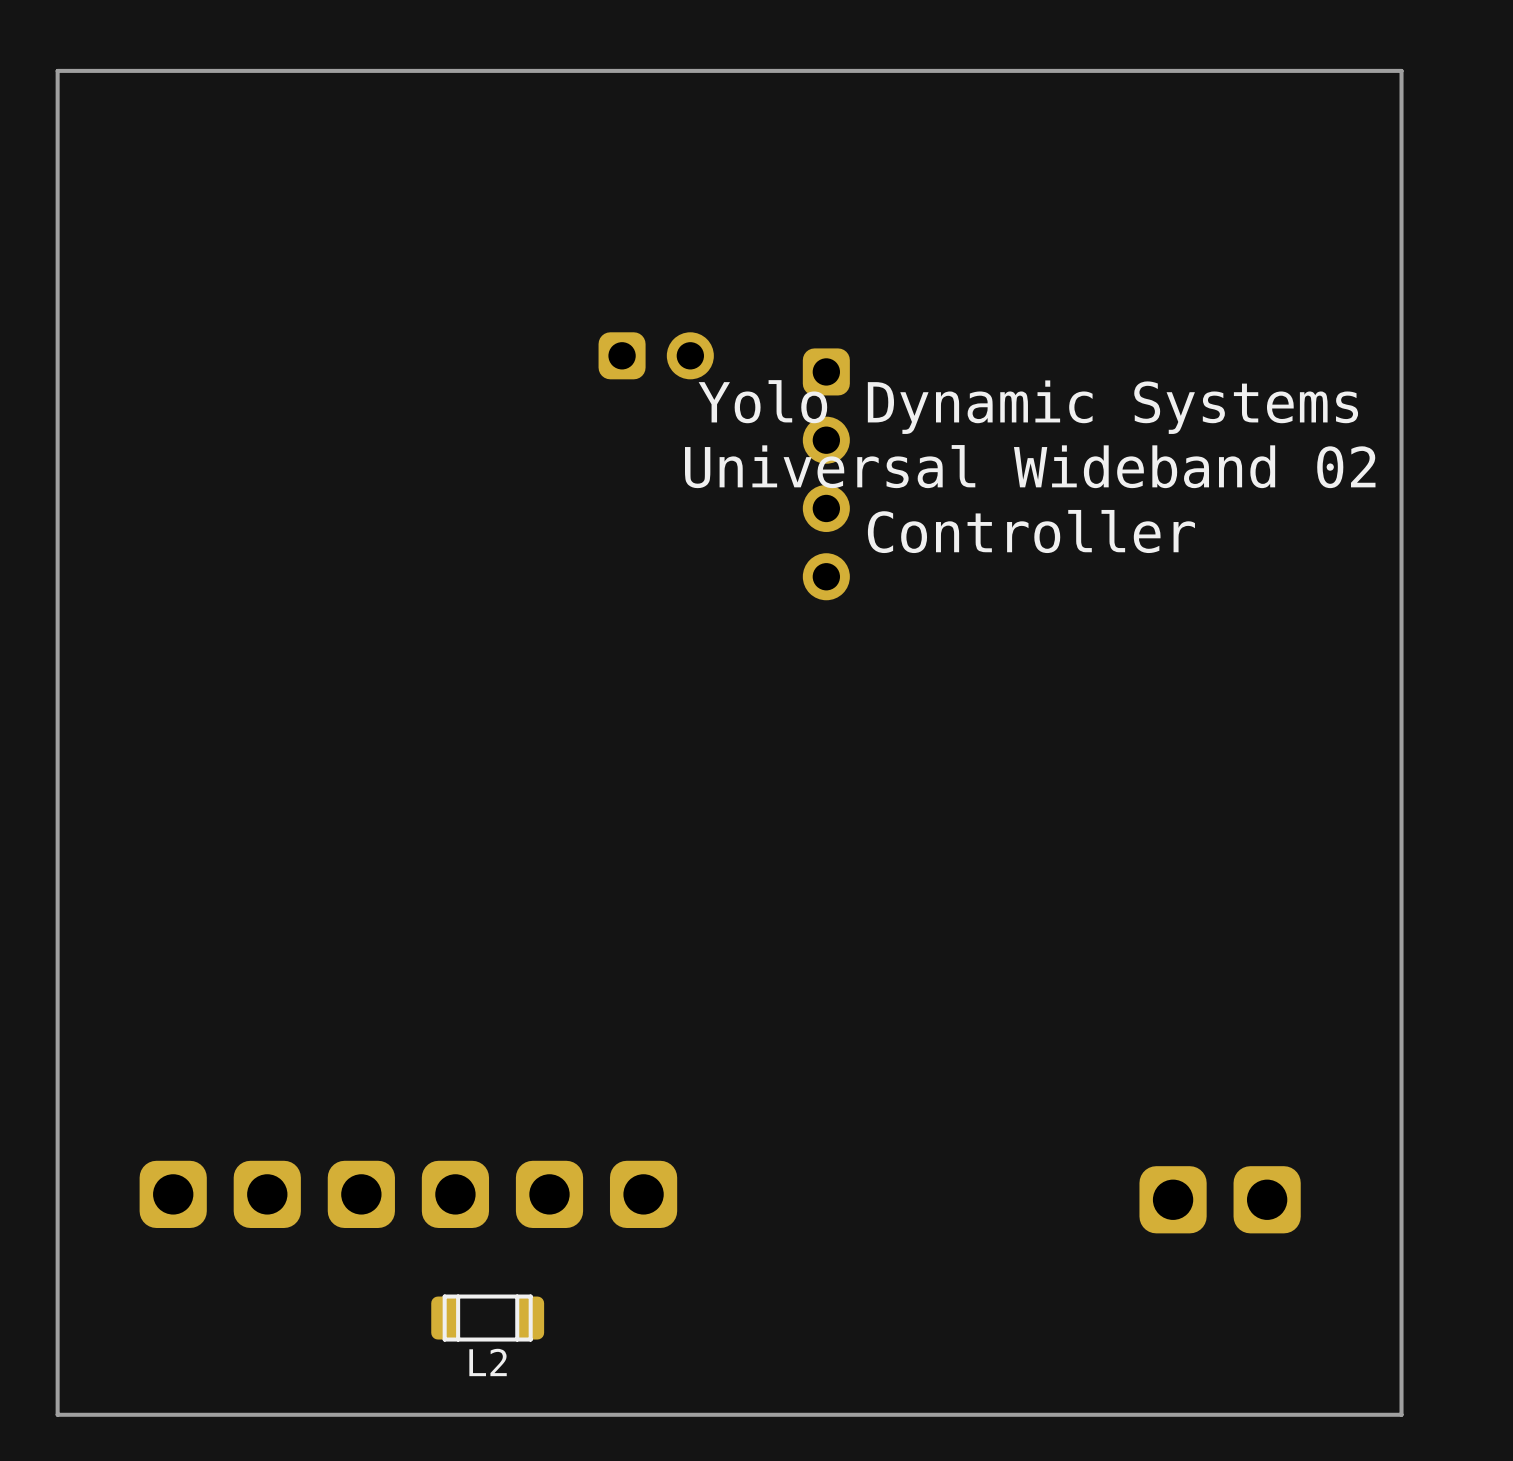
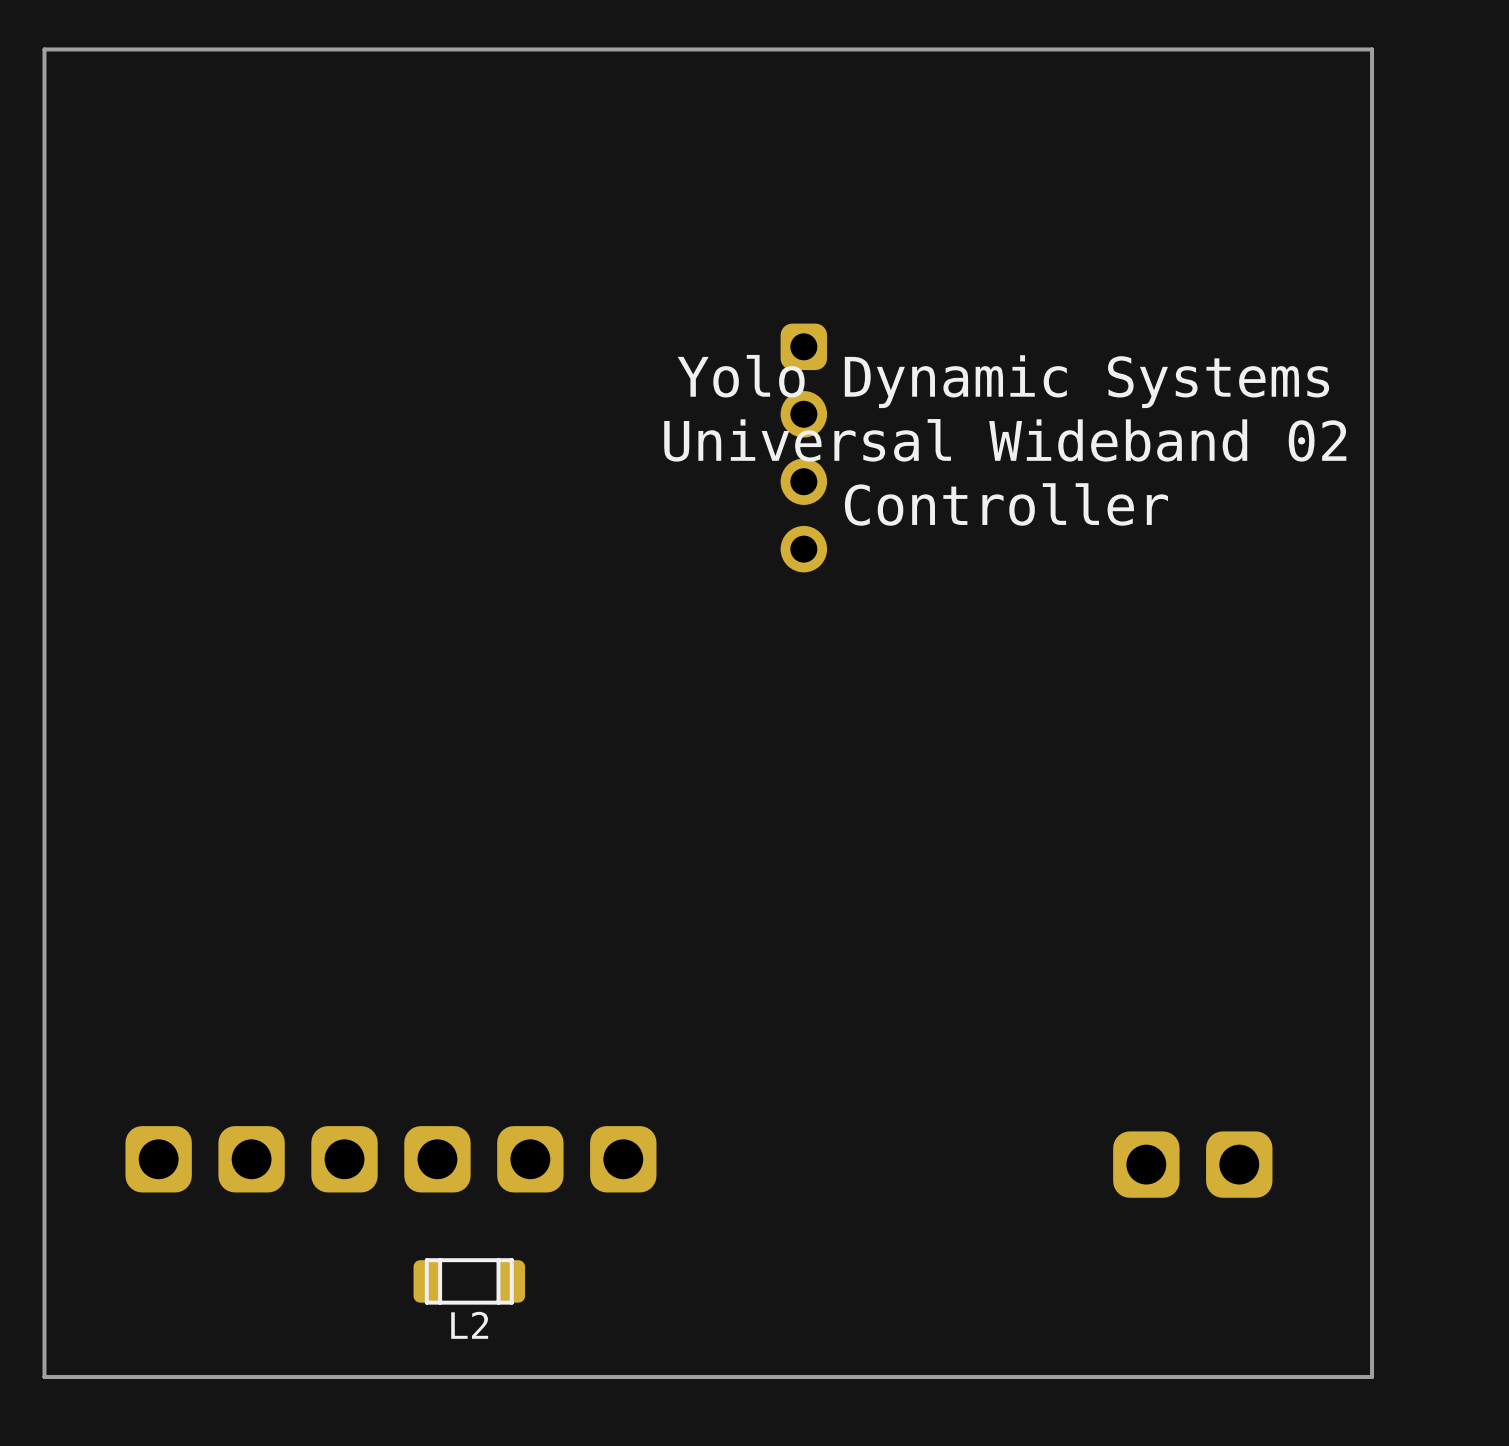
part: (656, 355) -> none

